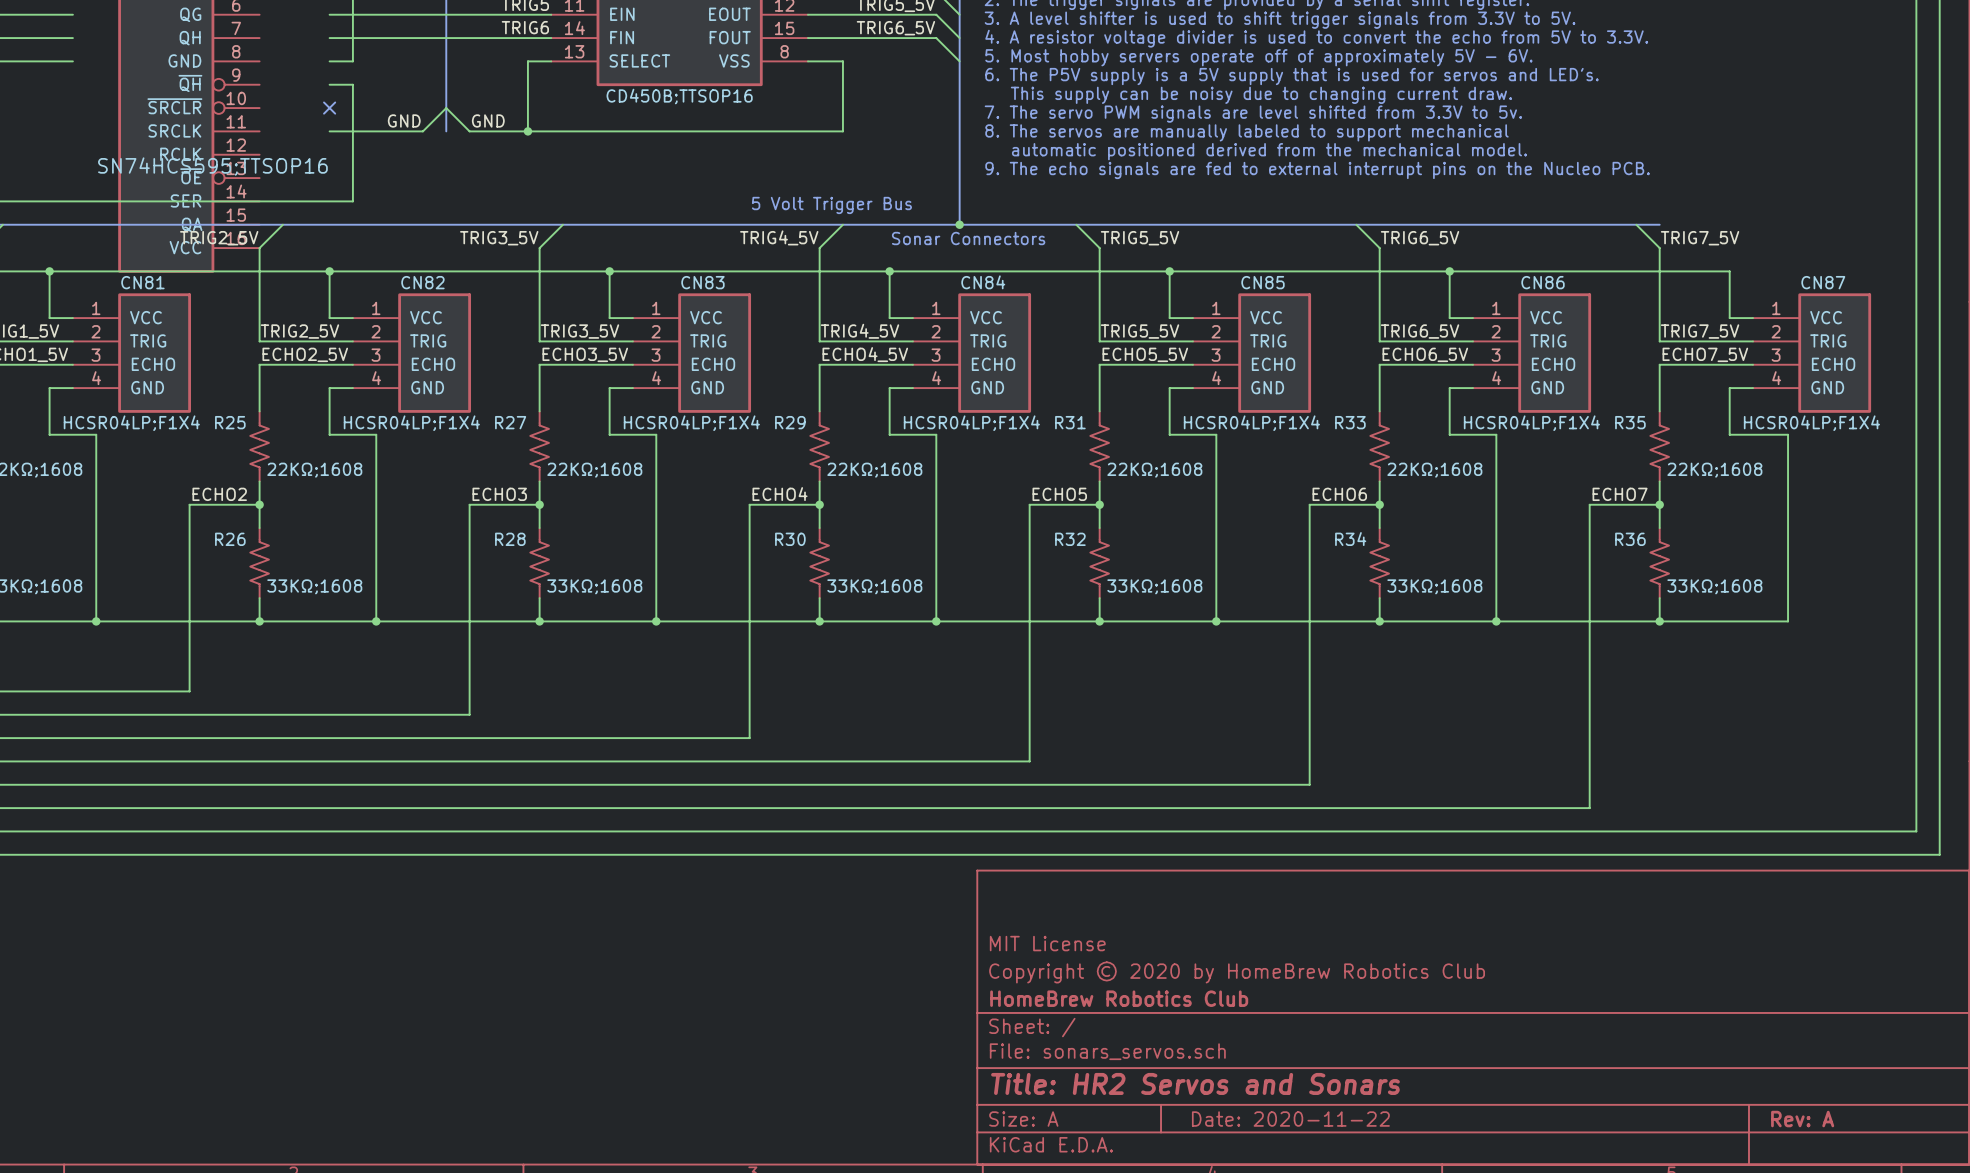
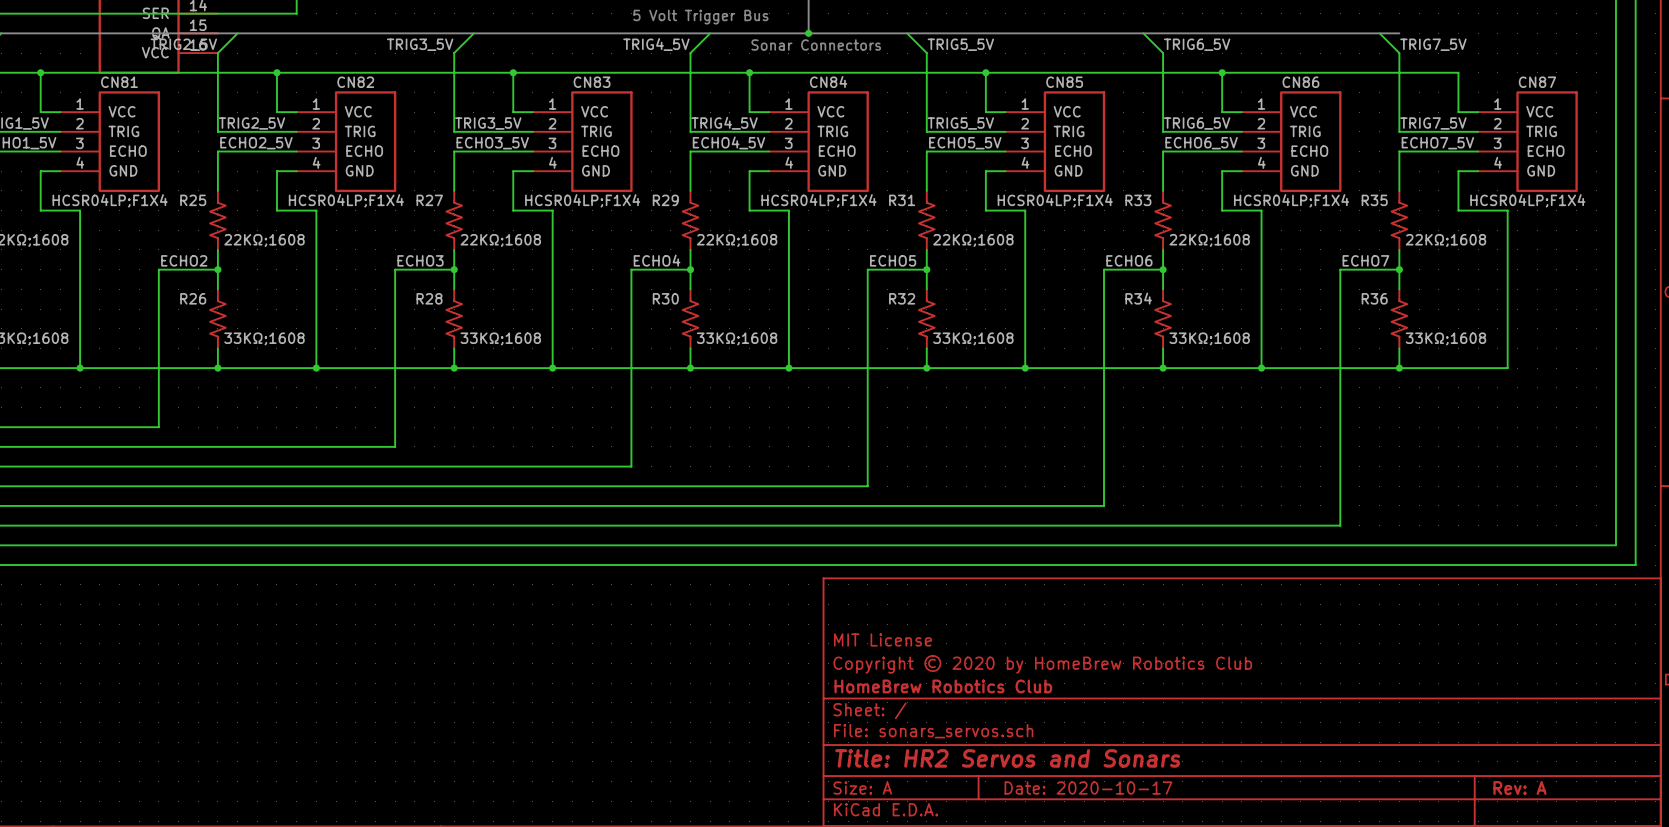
title block: Date: 2020-11-22 (1290, 1119) -> Date: 2020-10-17 (1088, 788)

